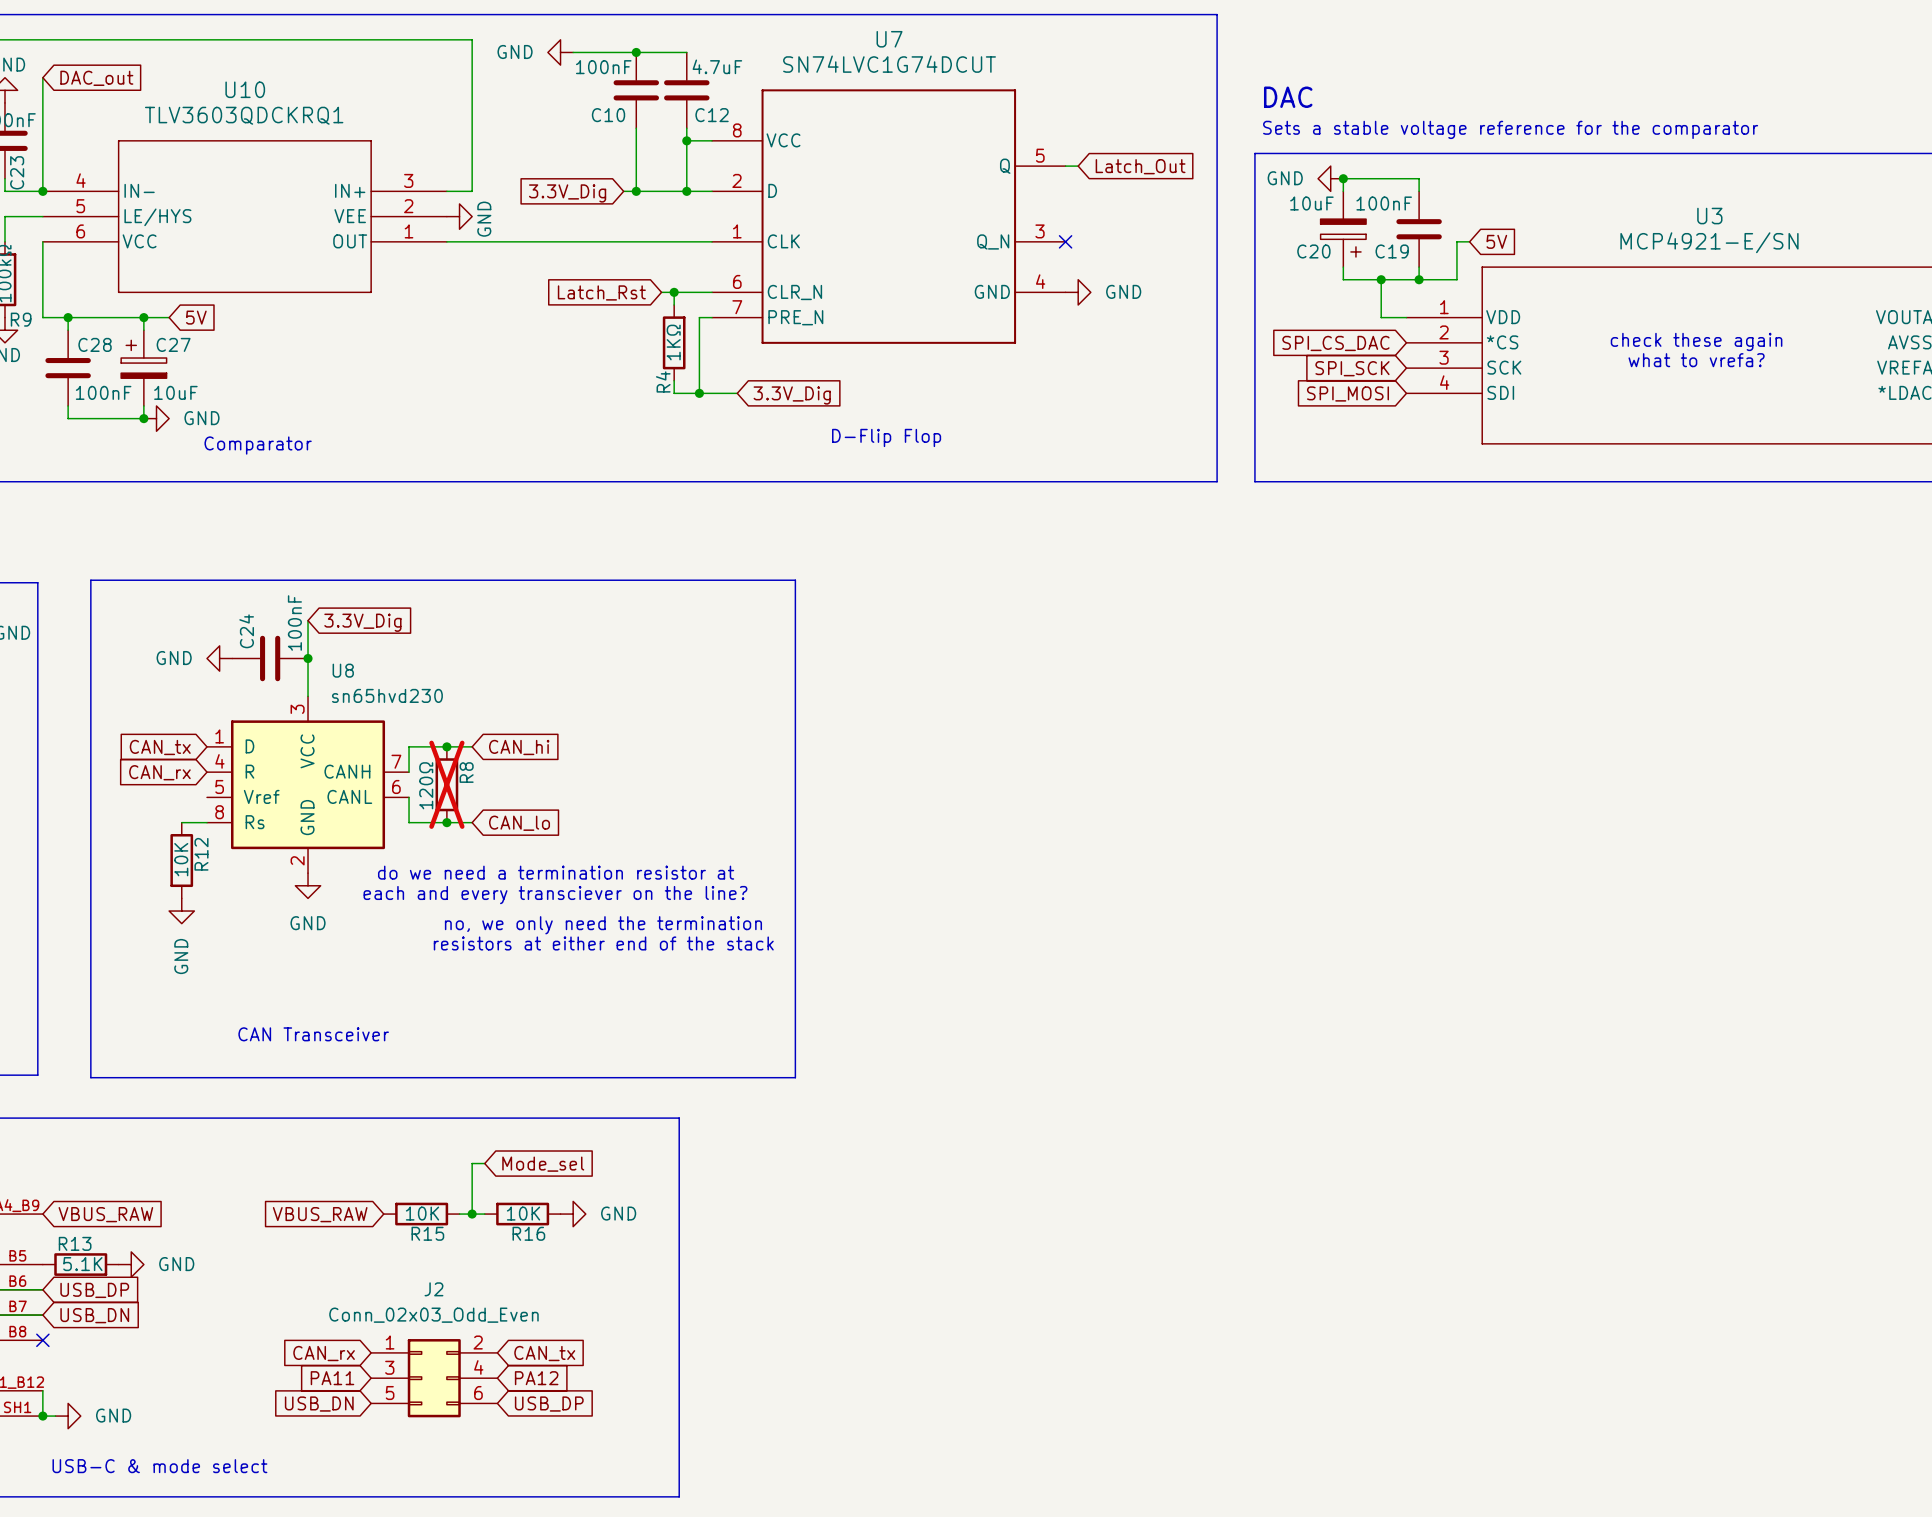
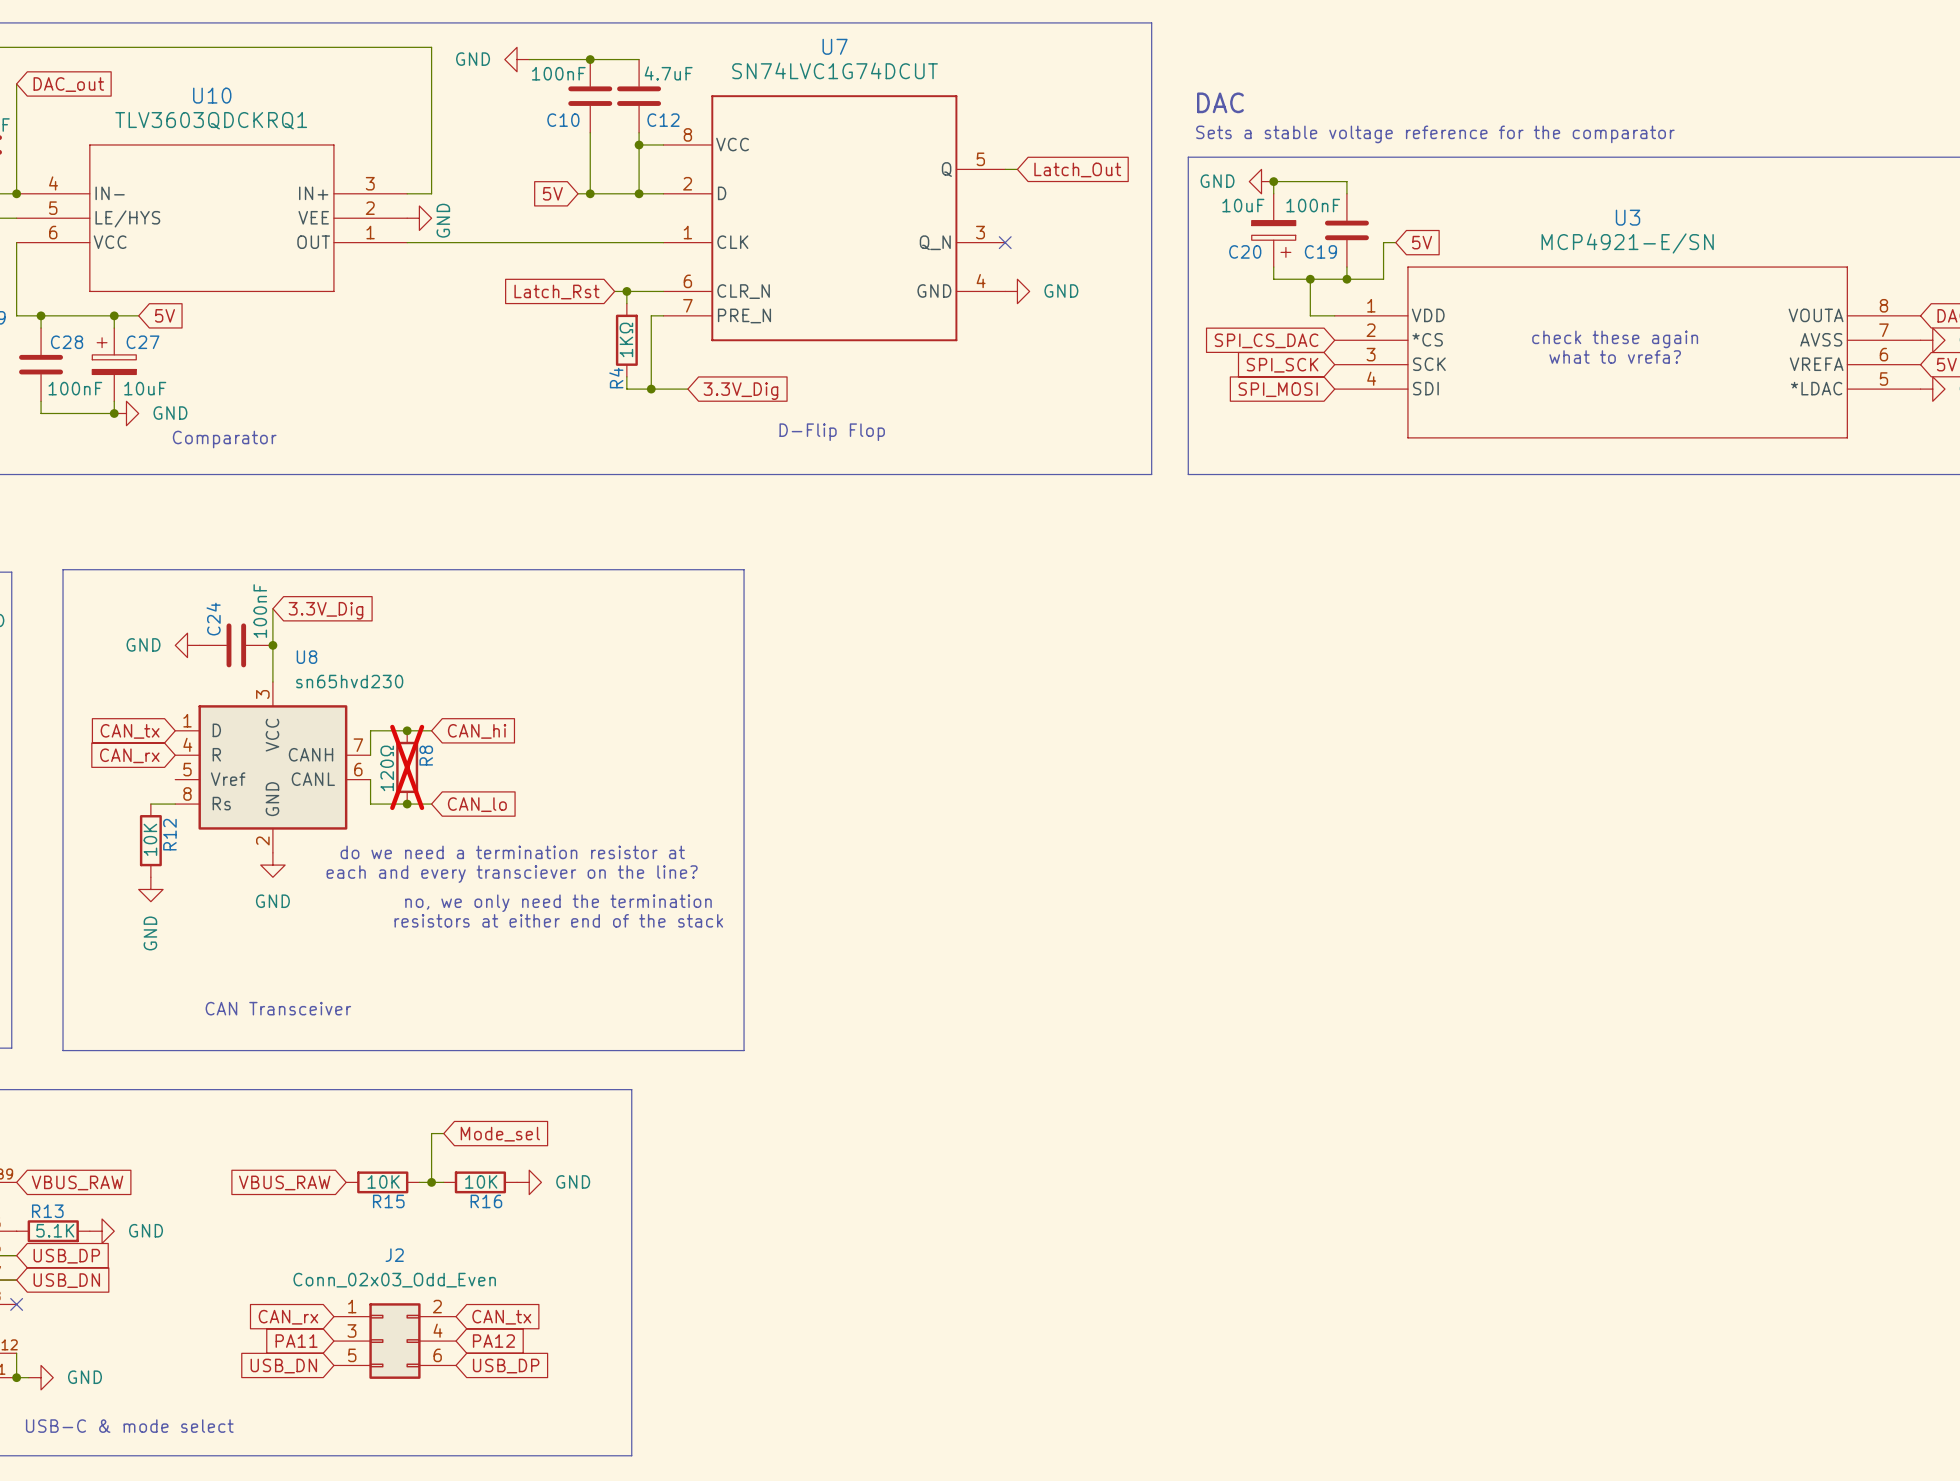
global label: 3.3V_Dig (567, 193) -> 5V (552, 193)

